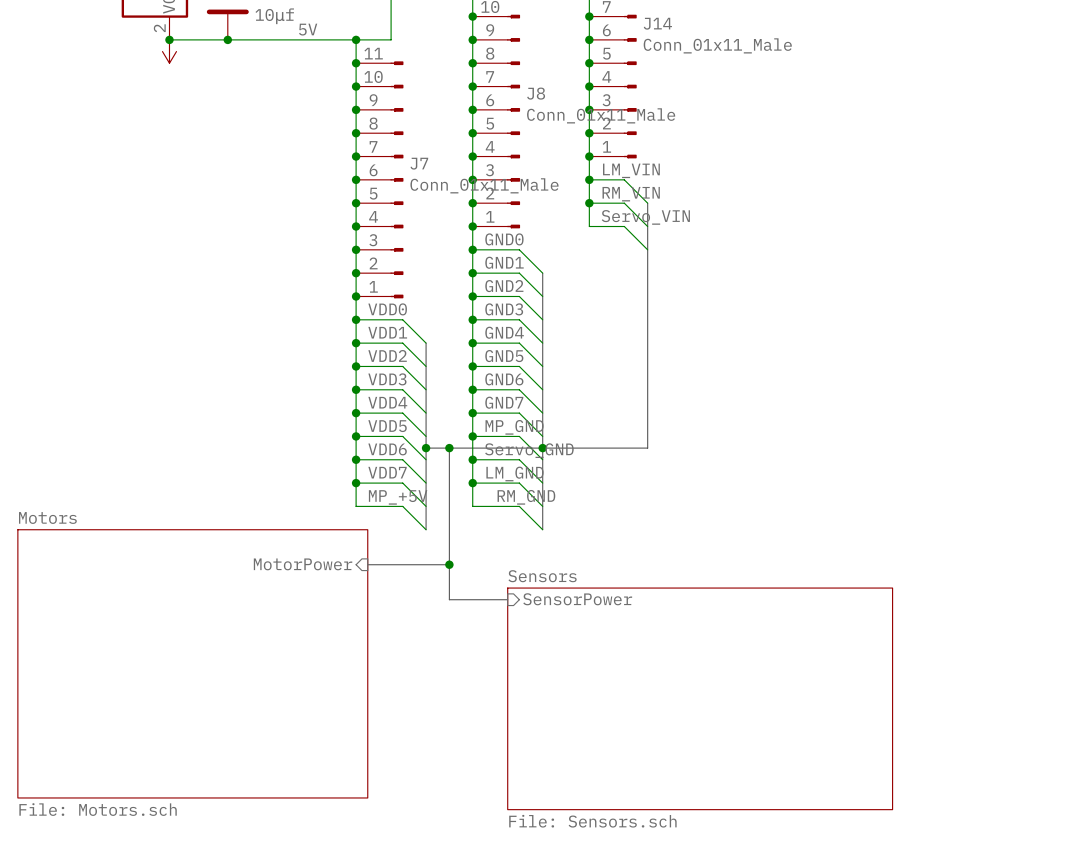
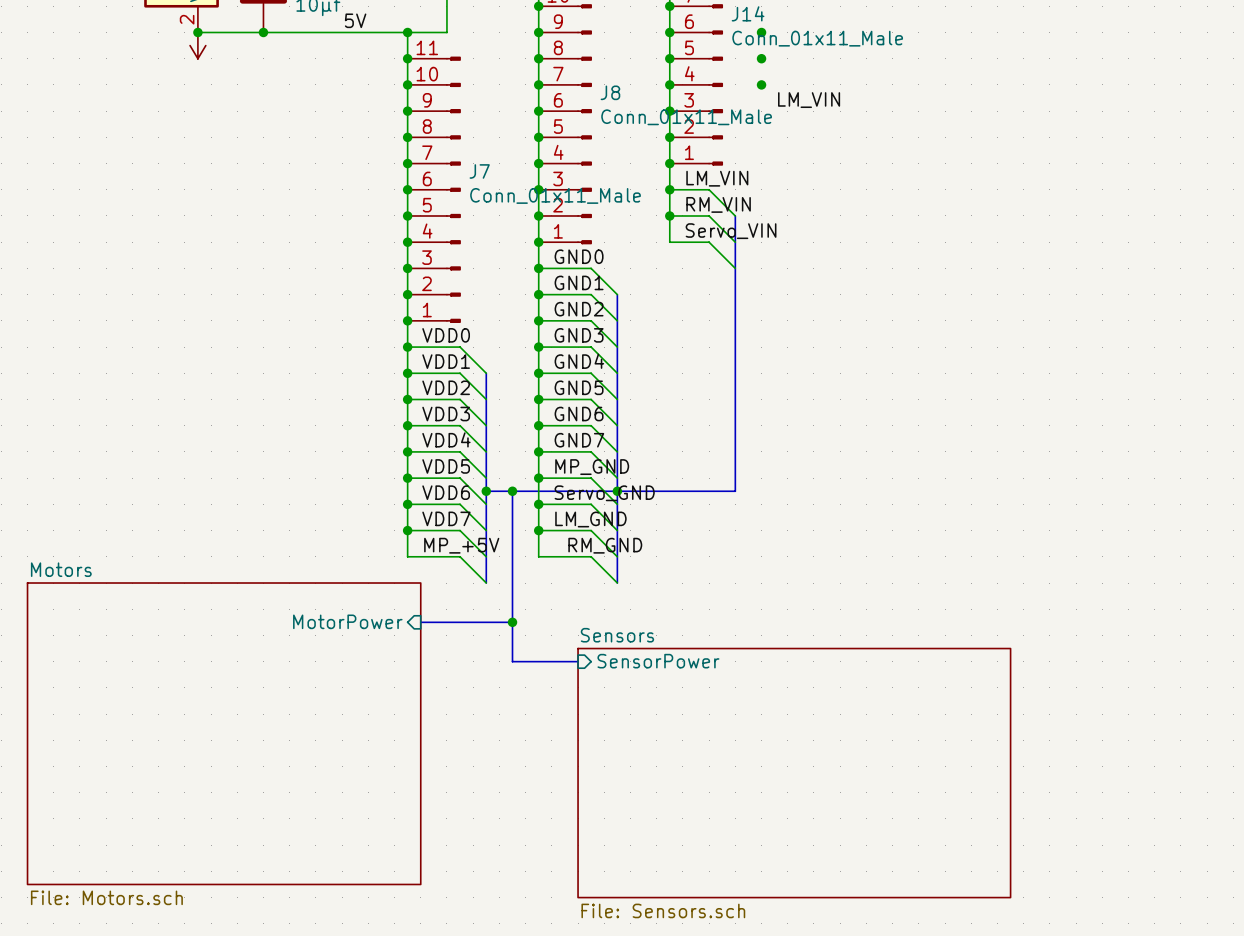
junction: none -> (761, 32)
junction: none -> (761, 58)
junction: none -> (761, 84)
label: none -> LM_VIN (809, 100)

